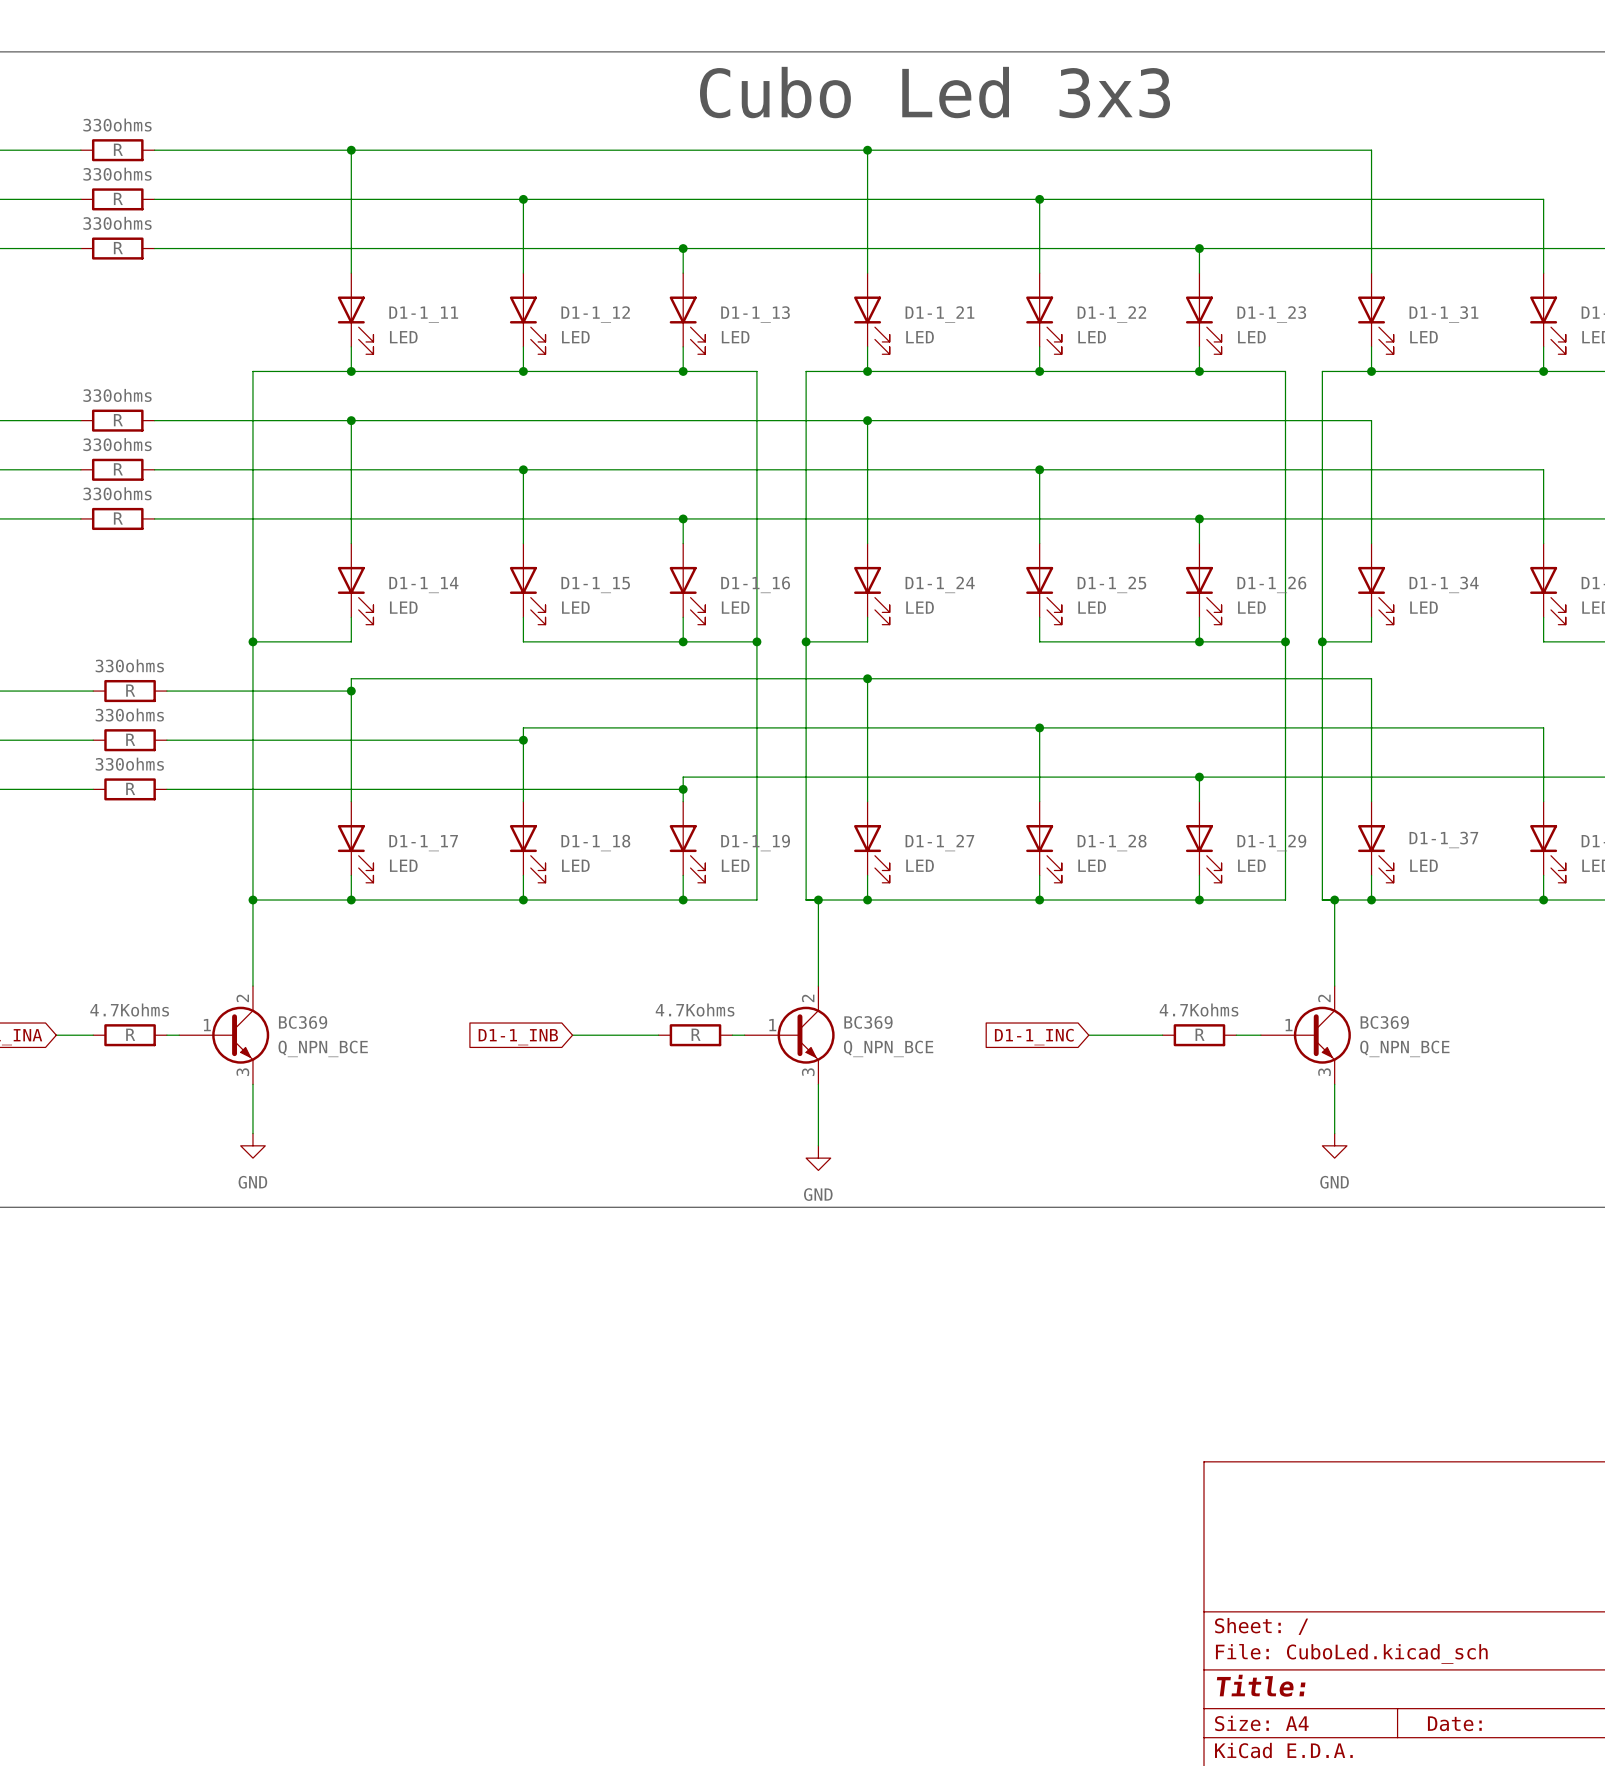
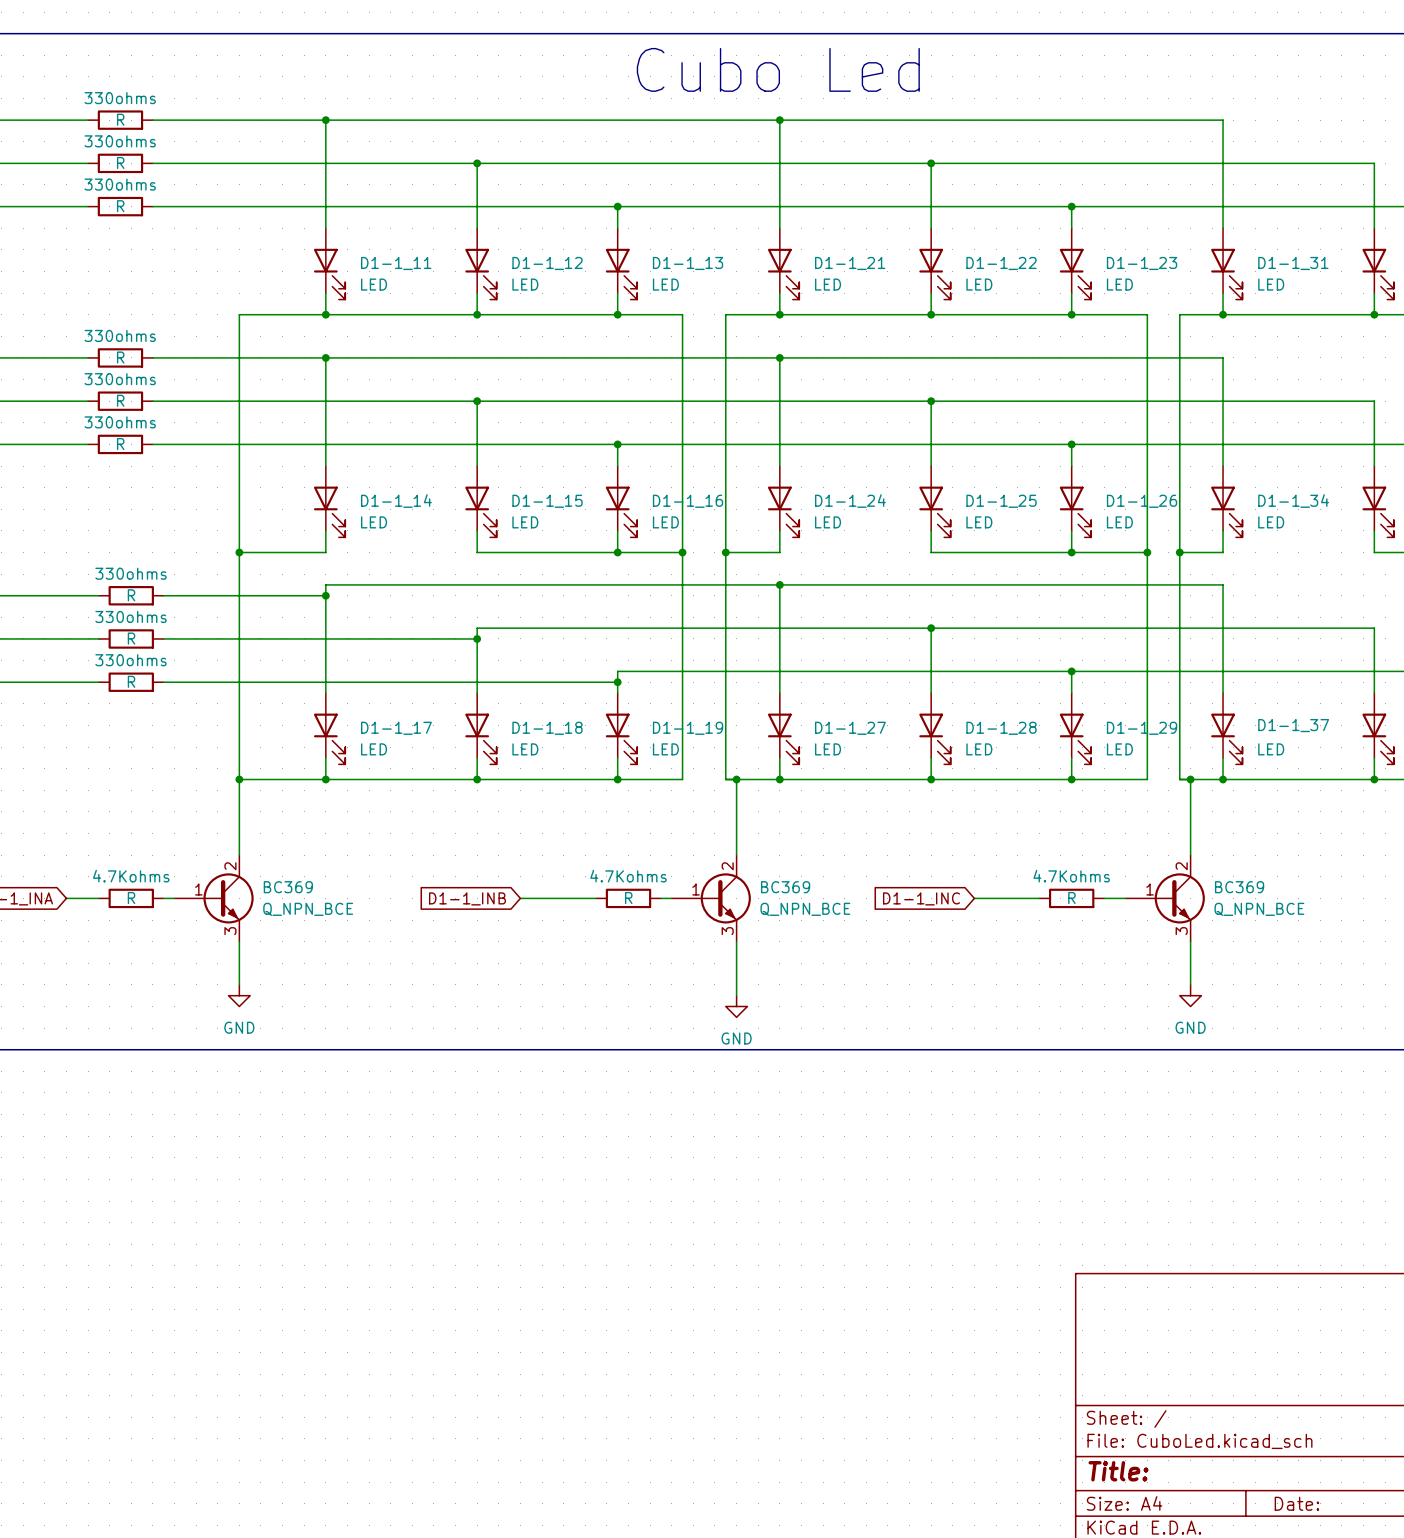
text: Cubo Led 3x3 (935, 92) -> Cubo Led (778, 69)

